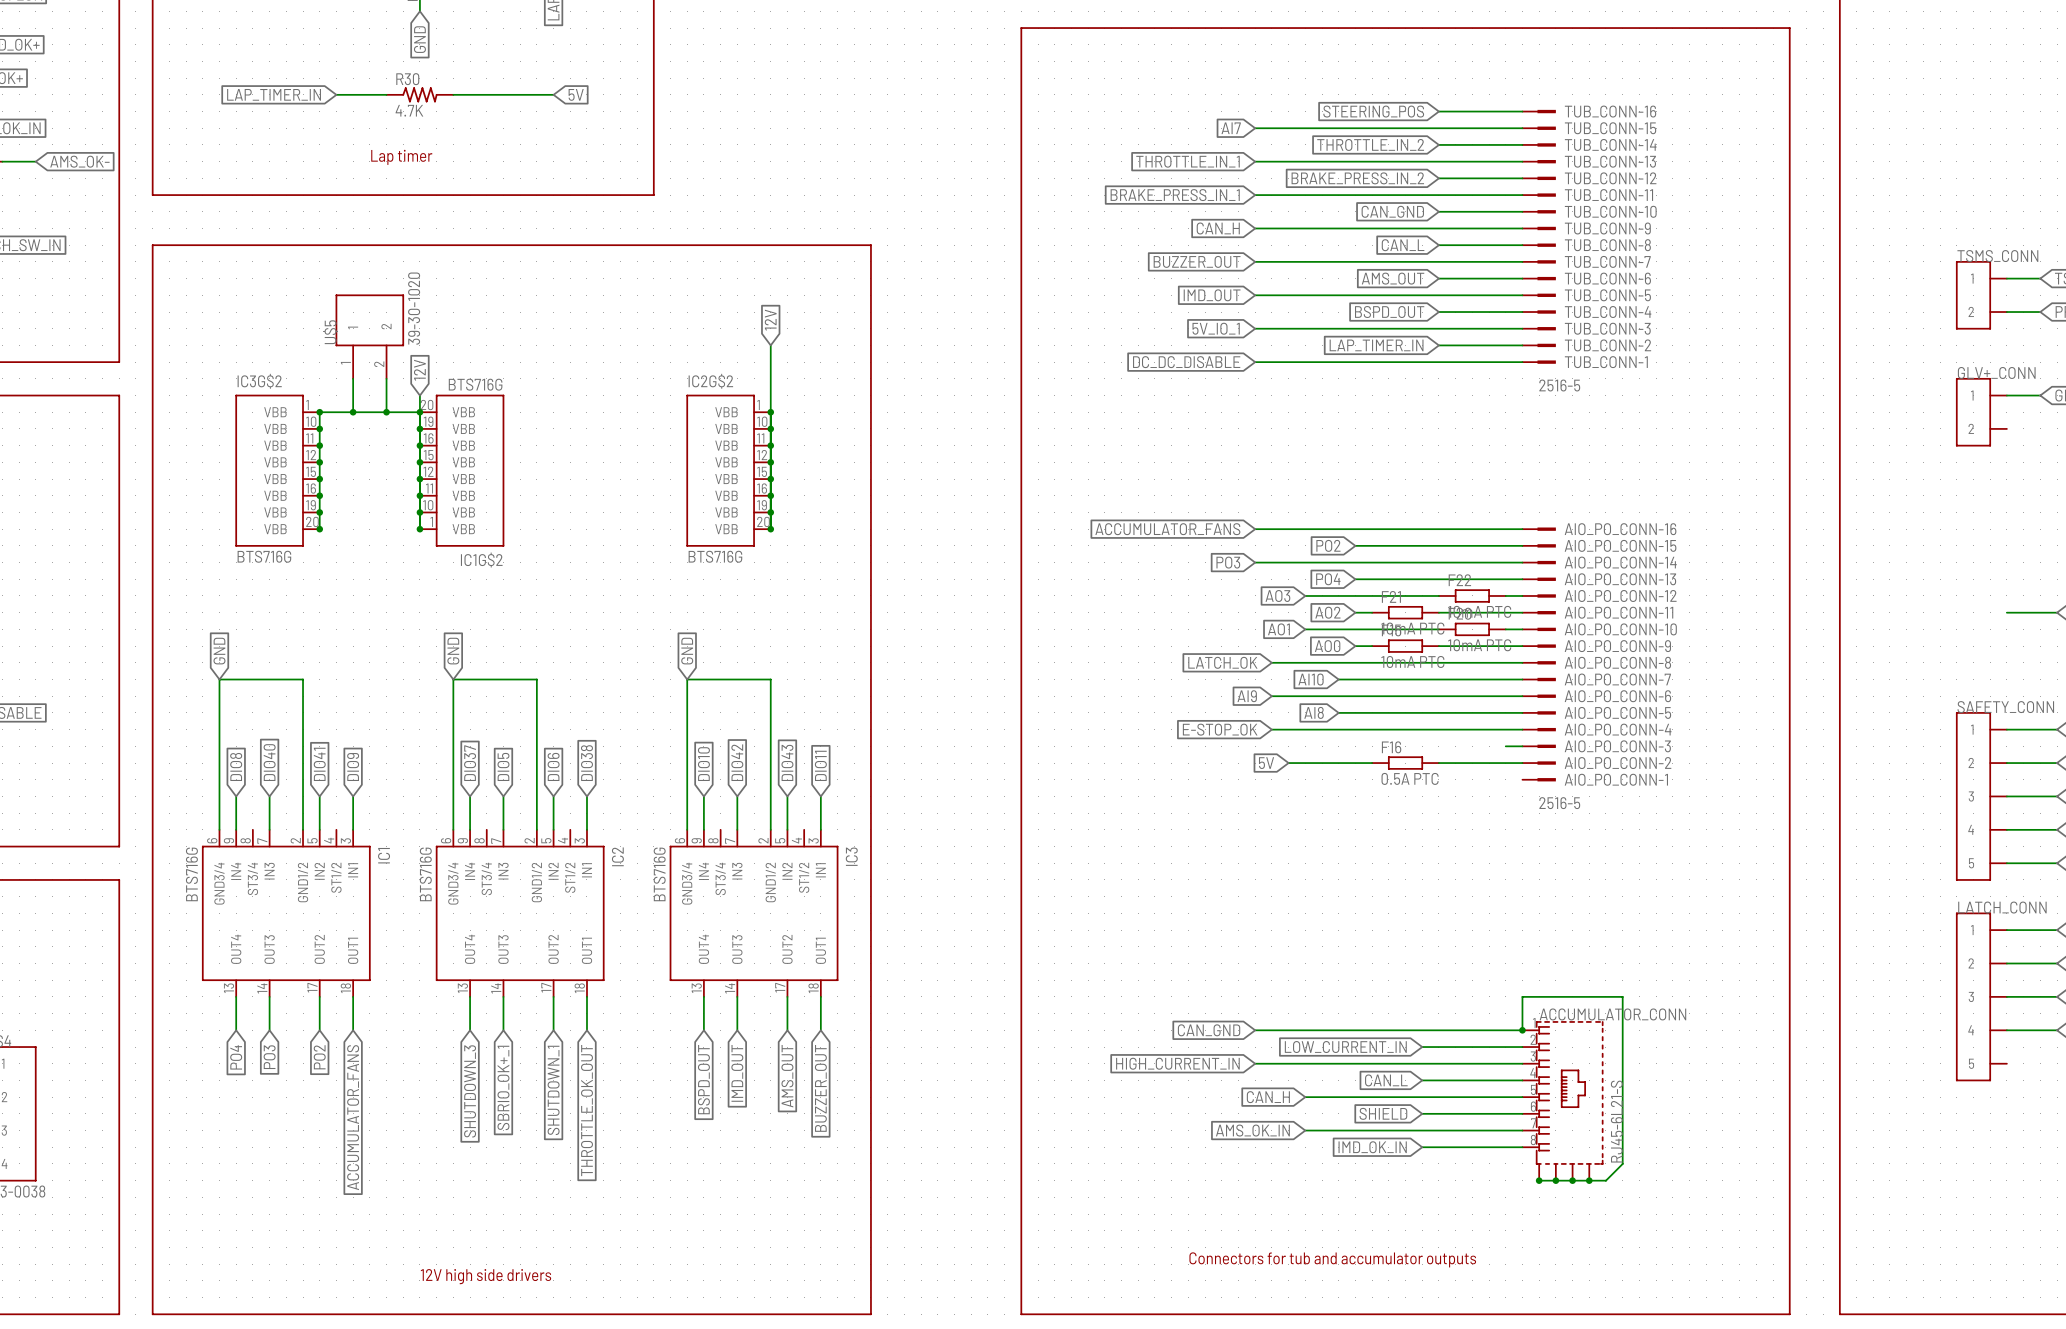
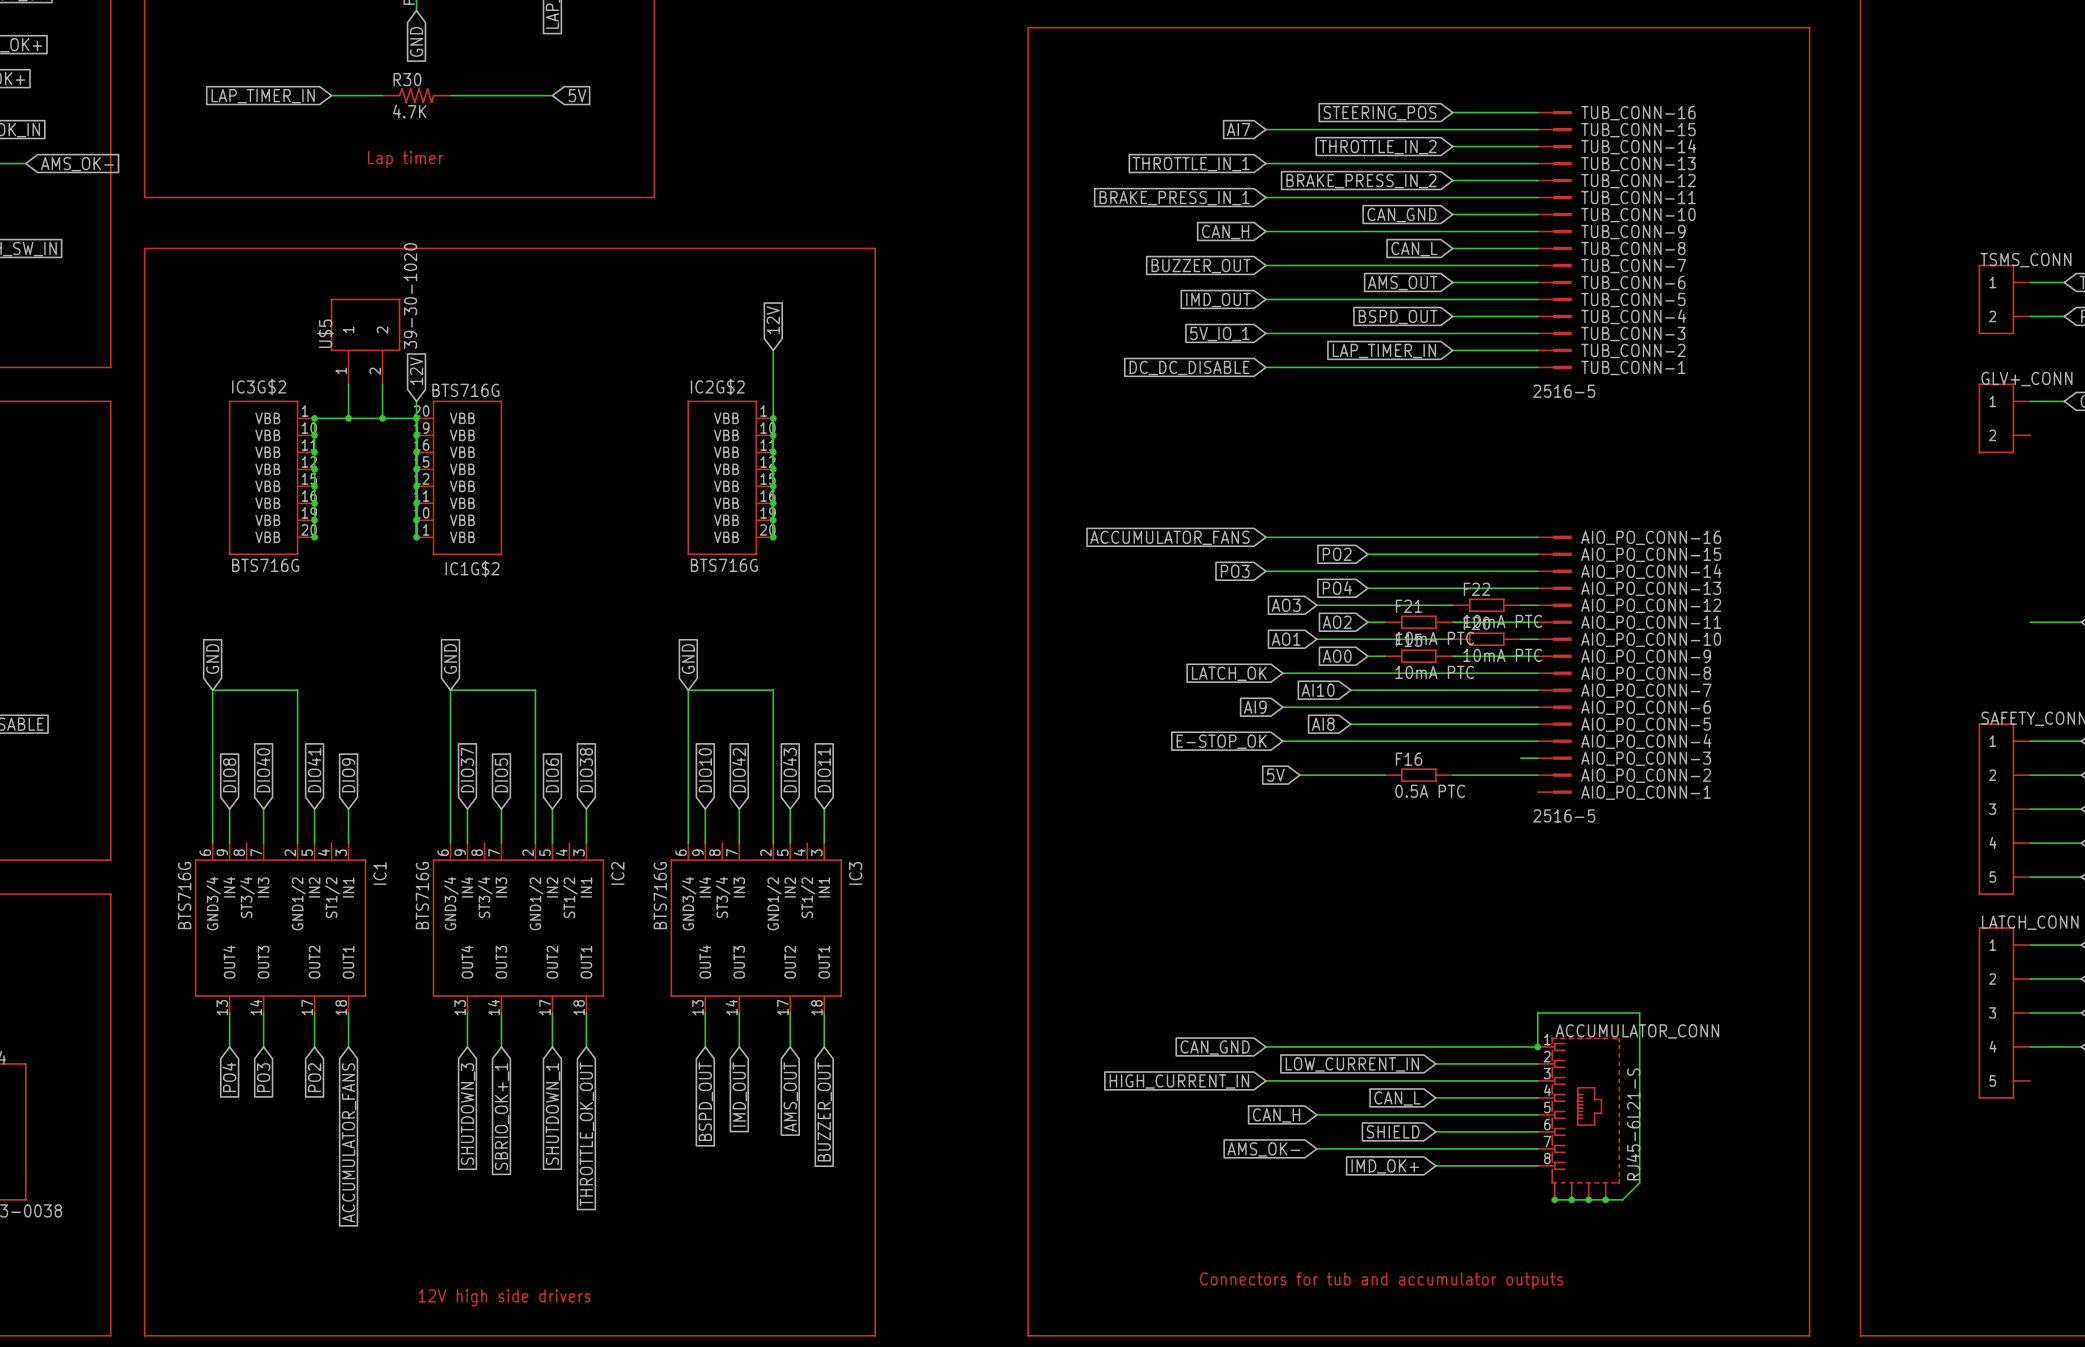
global label: AMS_OK_IN (1252, 1130) -> AMS_OK- (1263, 1149)
global label: IMD_OK_IN (1372, 1147) -> IMD_OK+ (1385, 1166)

